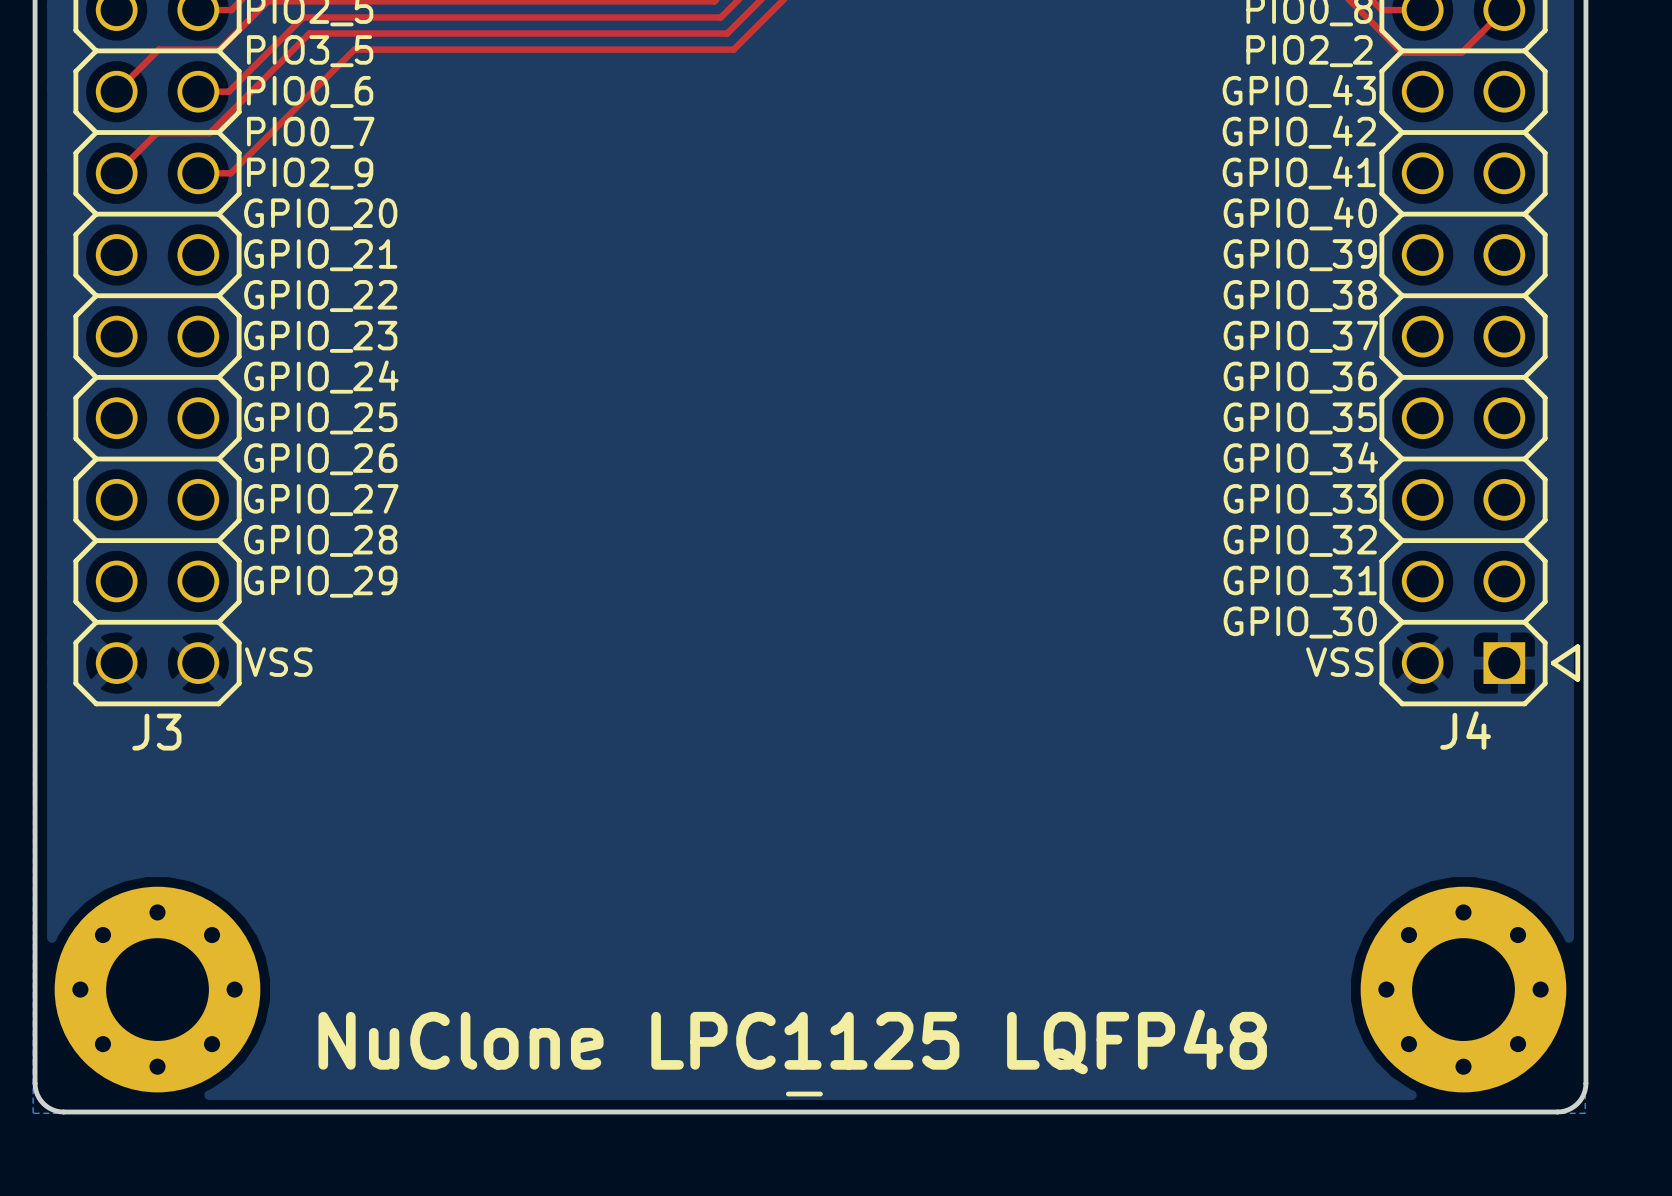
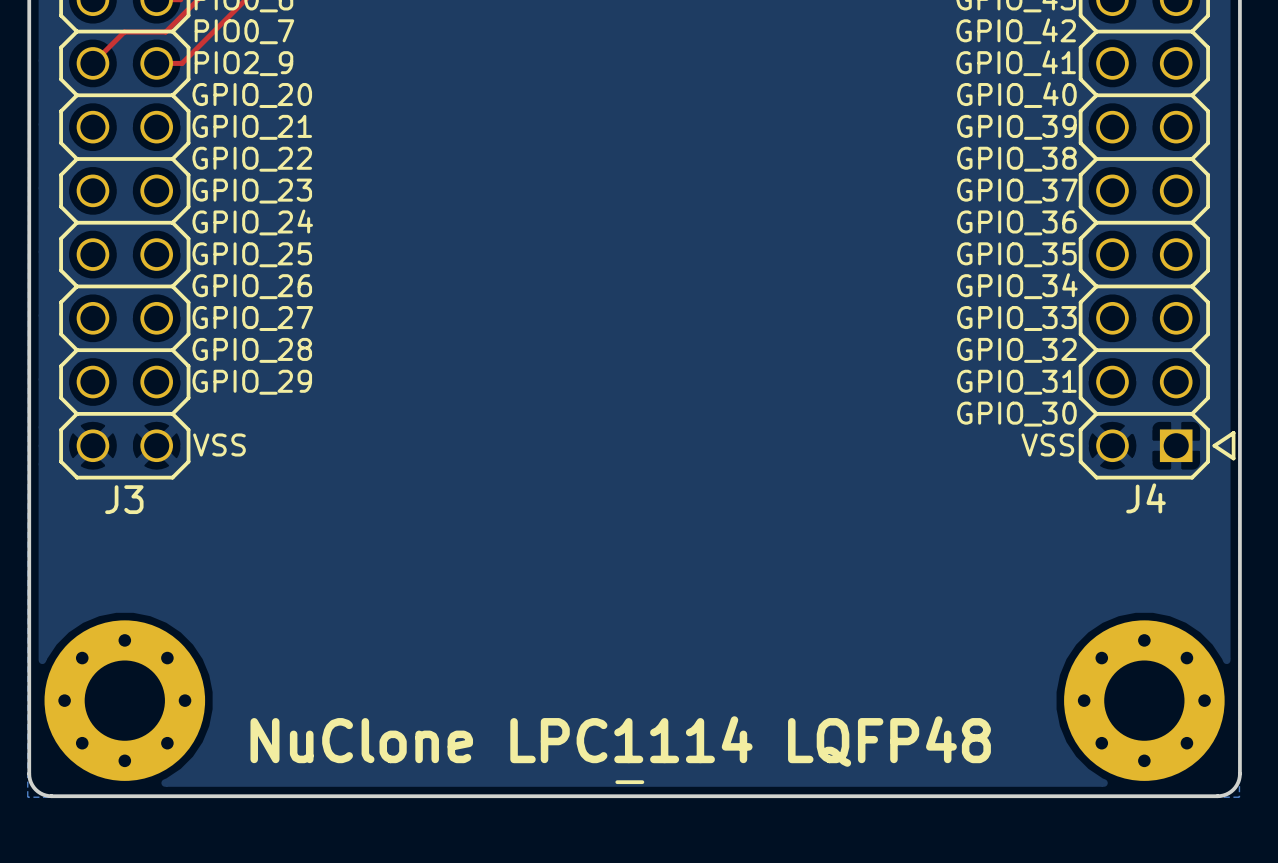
drawing shape: [318, 1009, 1267, 1097] -> [250, 716, 991, 785]

